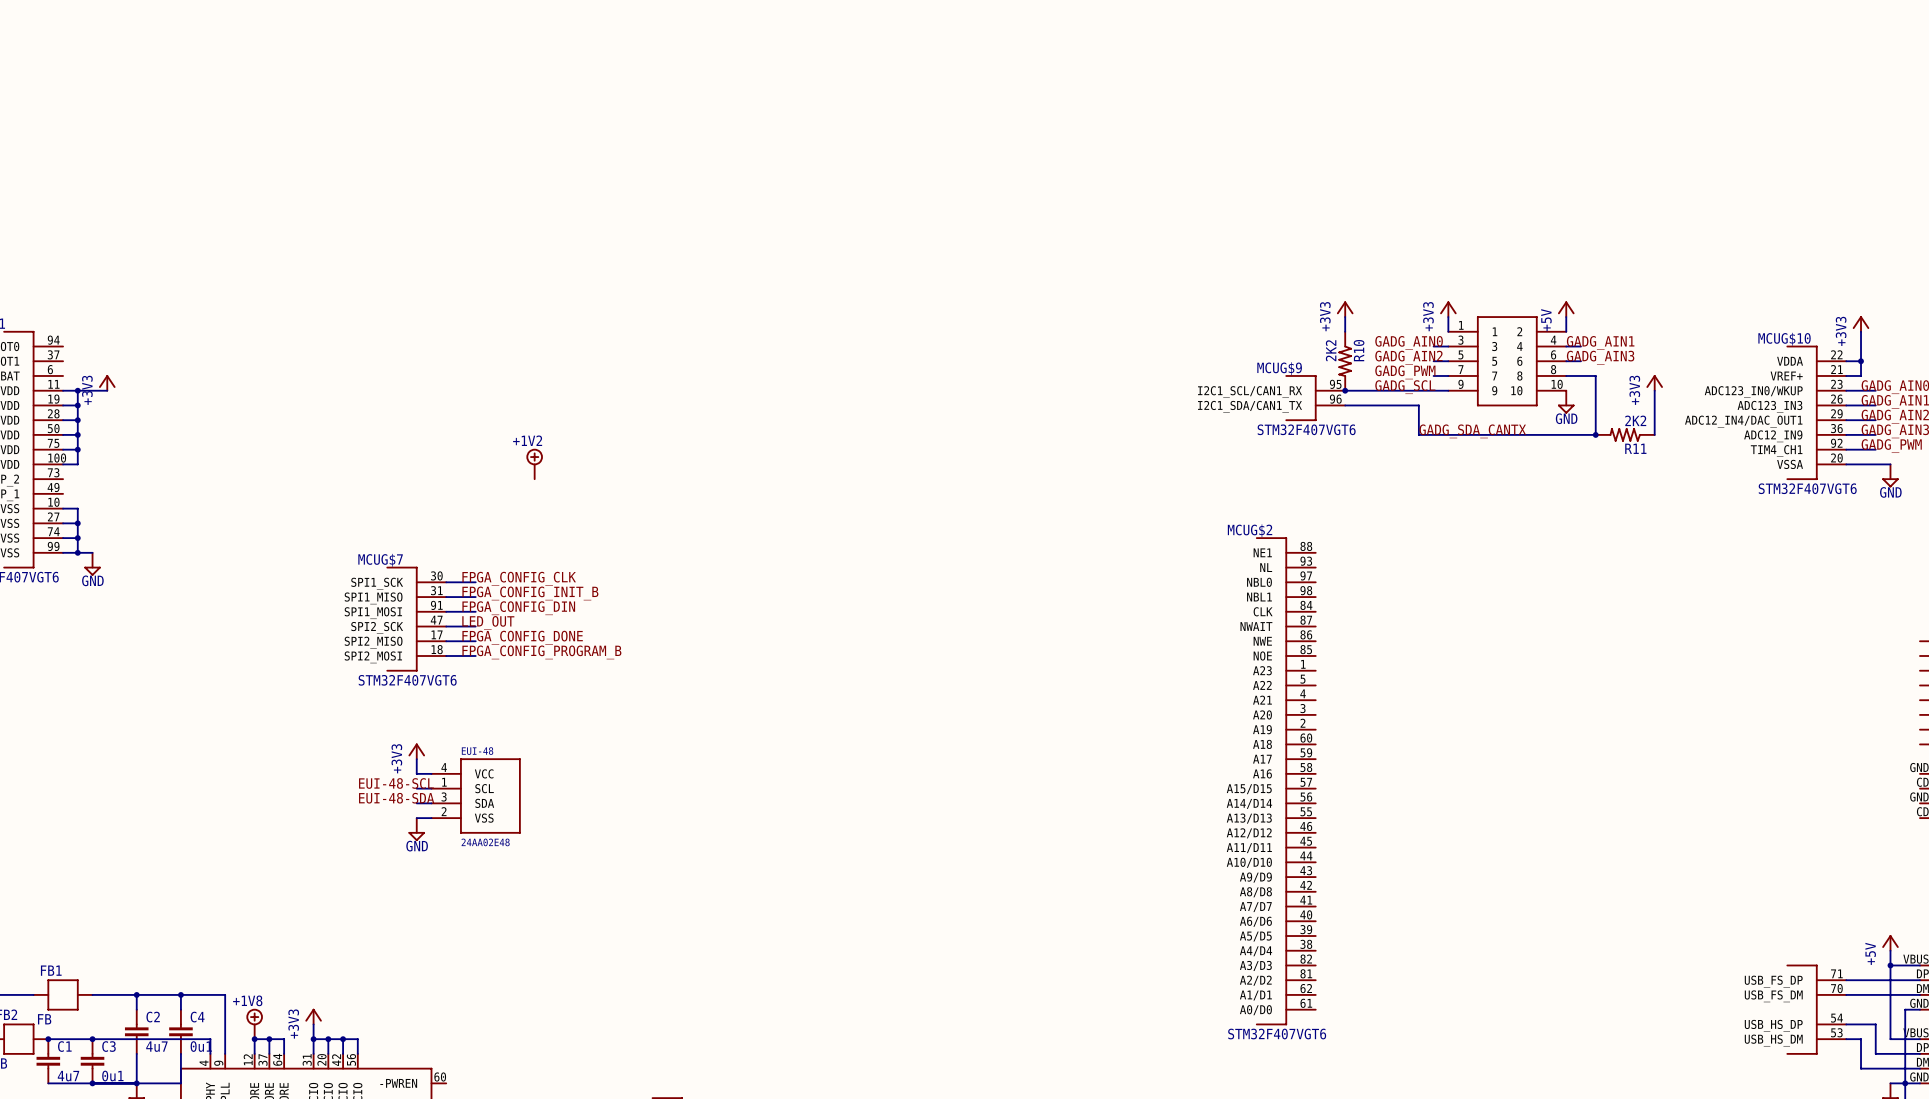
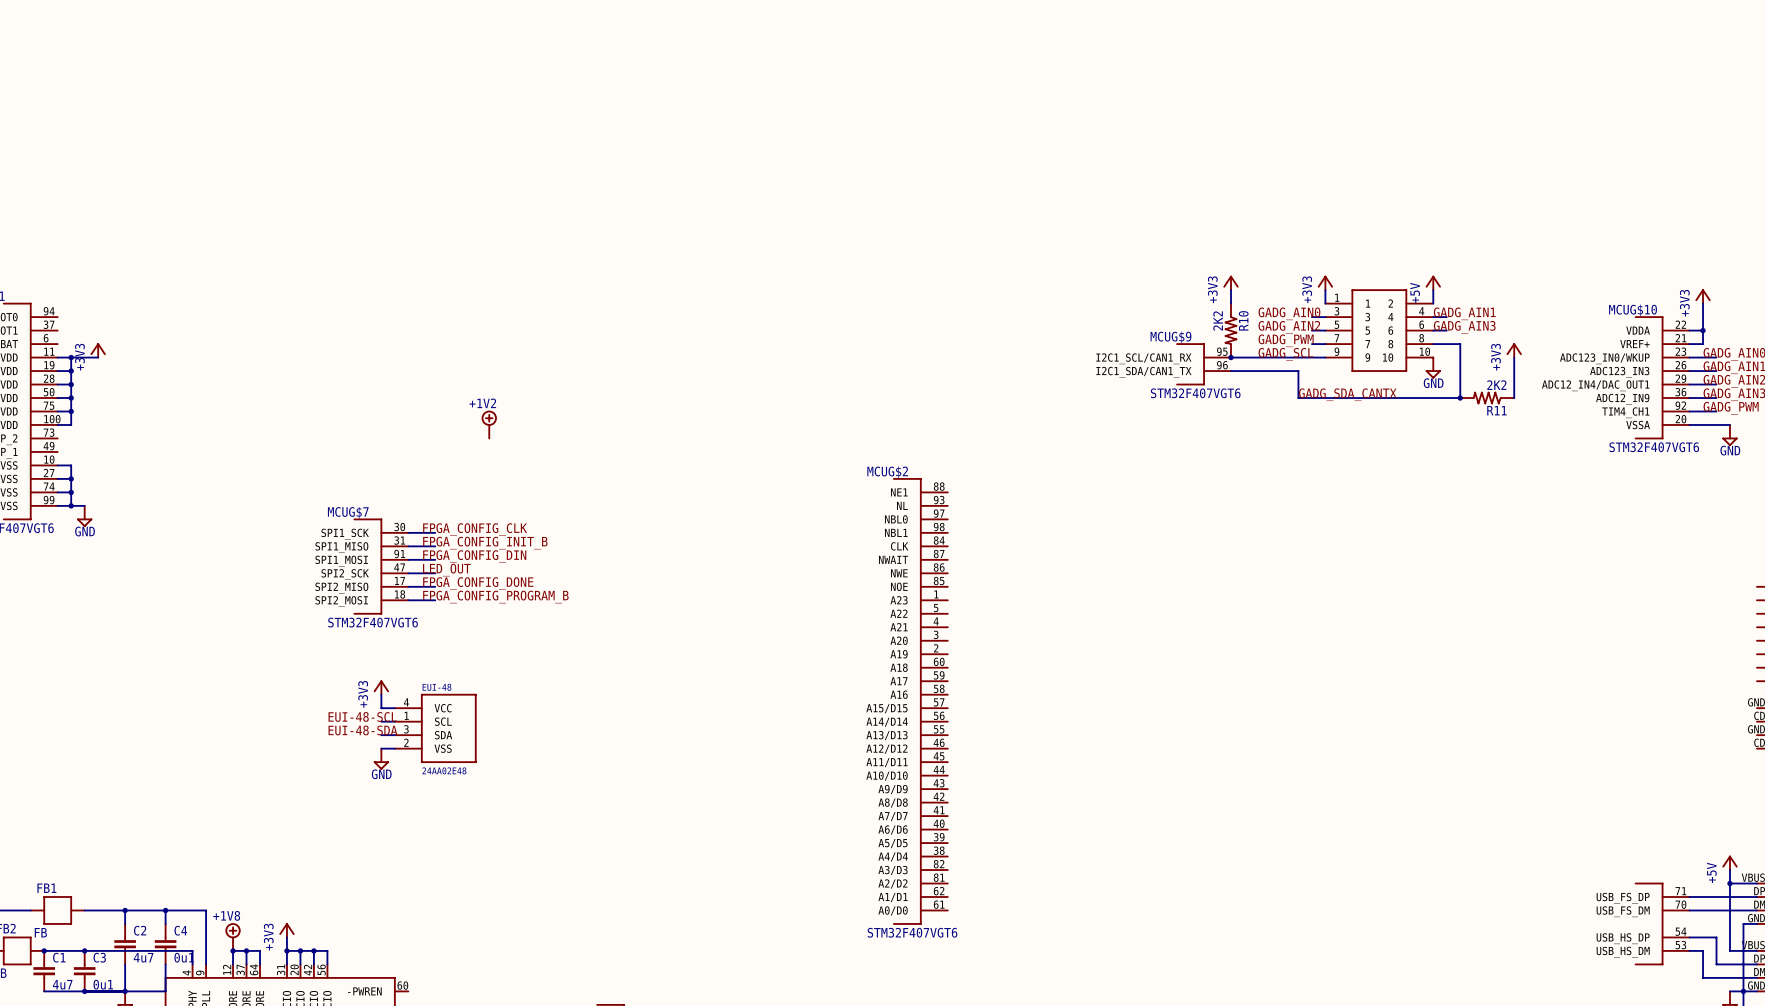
MCUG$2 position: (1285, 781) -> (920, 701)

